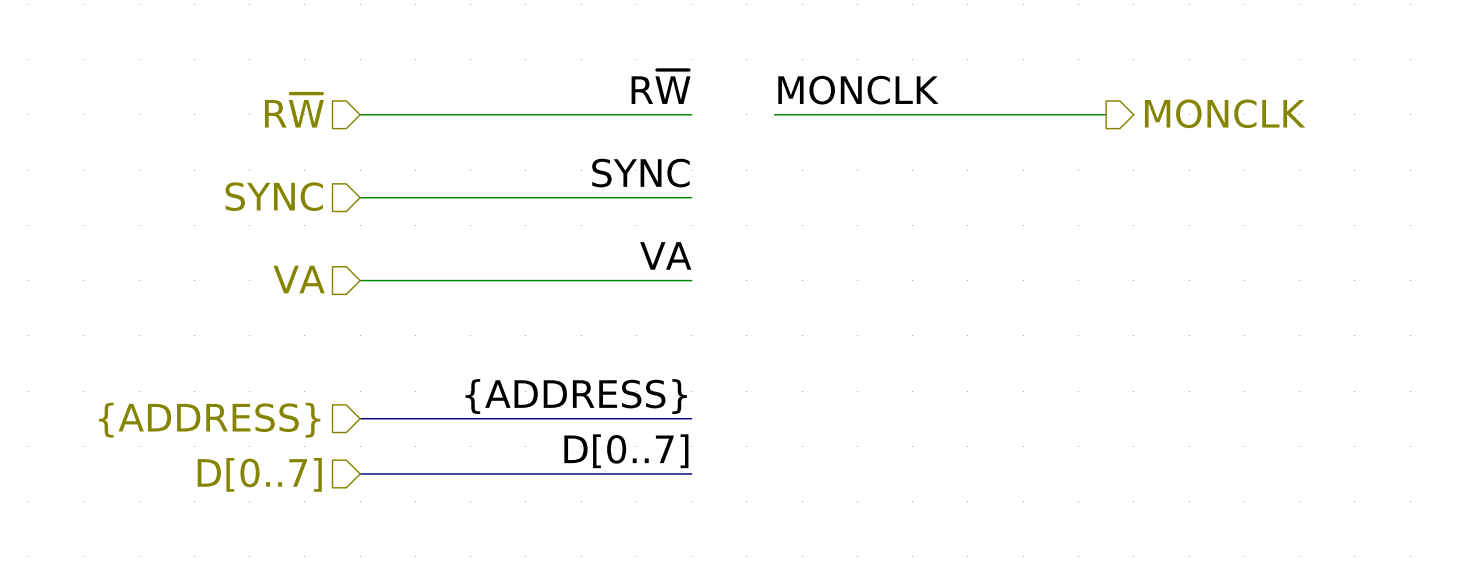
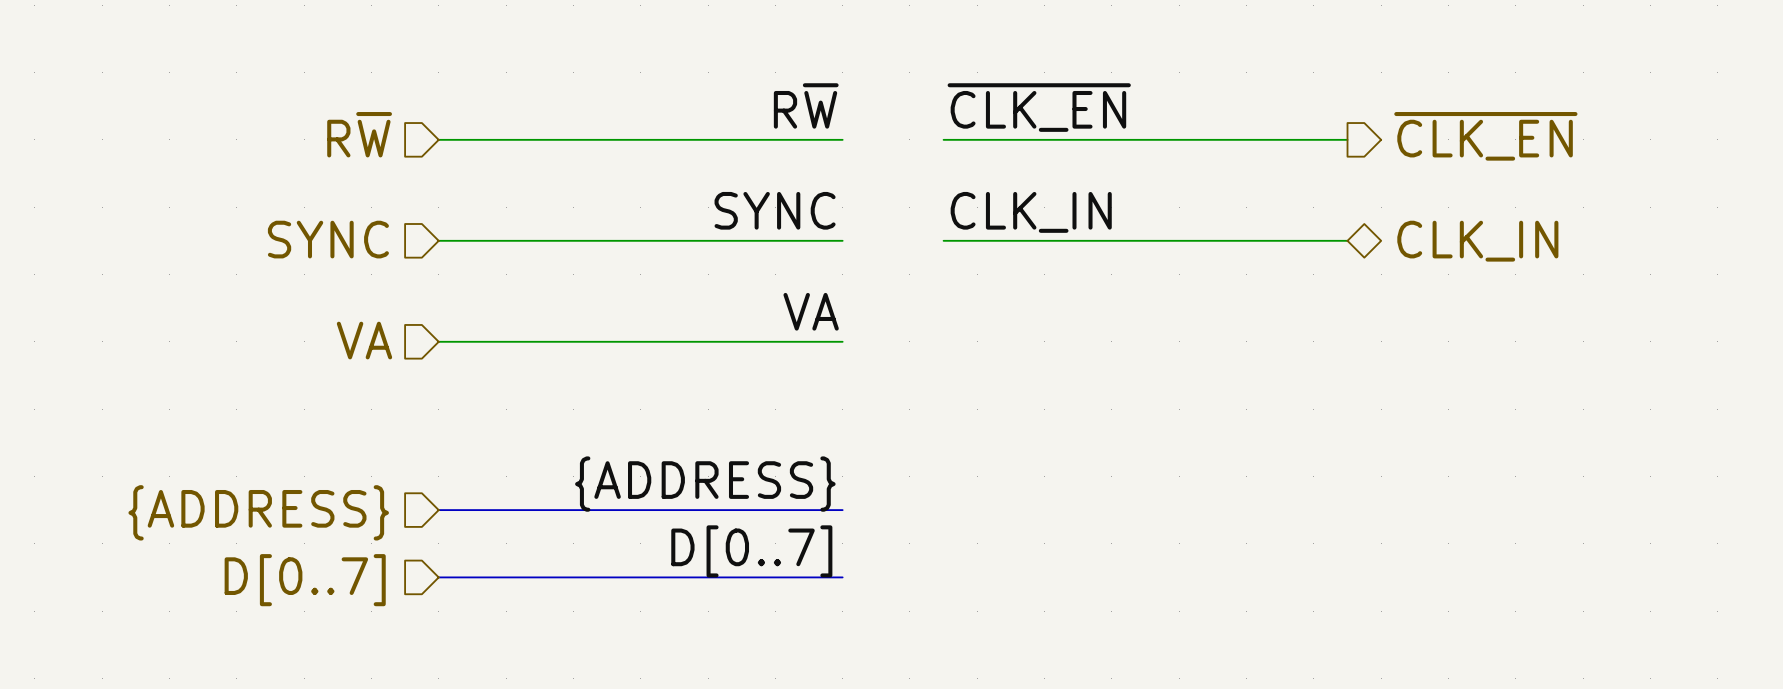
label: MONCLK (858, 90) -> ~{CLK_EN} (1039, 107)
hierarchical label: MONCLK (1225, 113) -> ~{CLK_EN} (1485, 136)
label: none -> CLK_IN (1031, 212)
wire: none -> (943, 240) (1347, 240)
hierarchical label: none -> CLK_IN (1477, 241)

